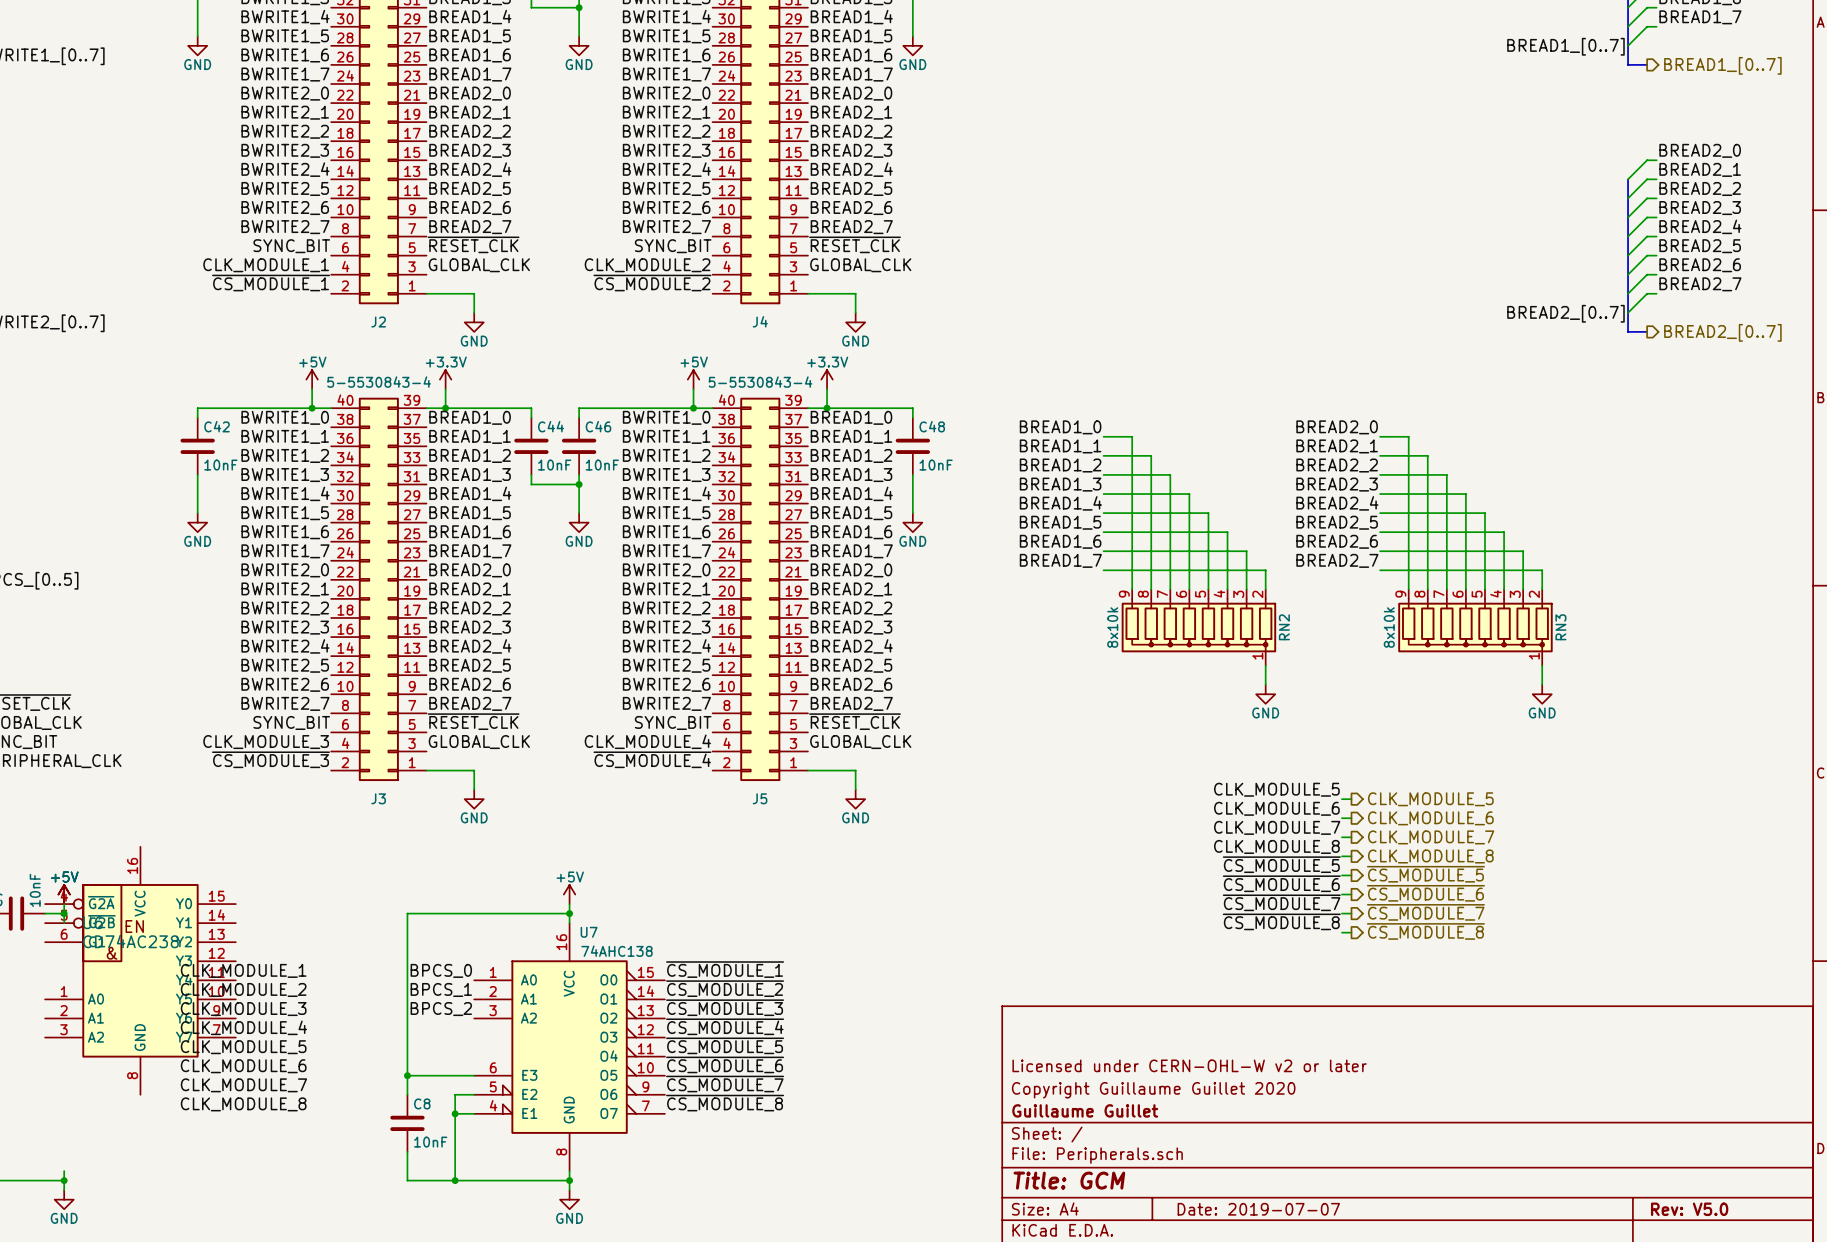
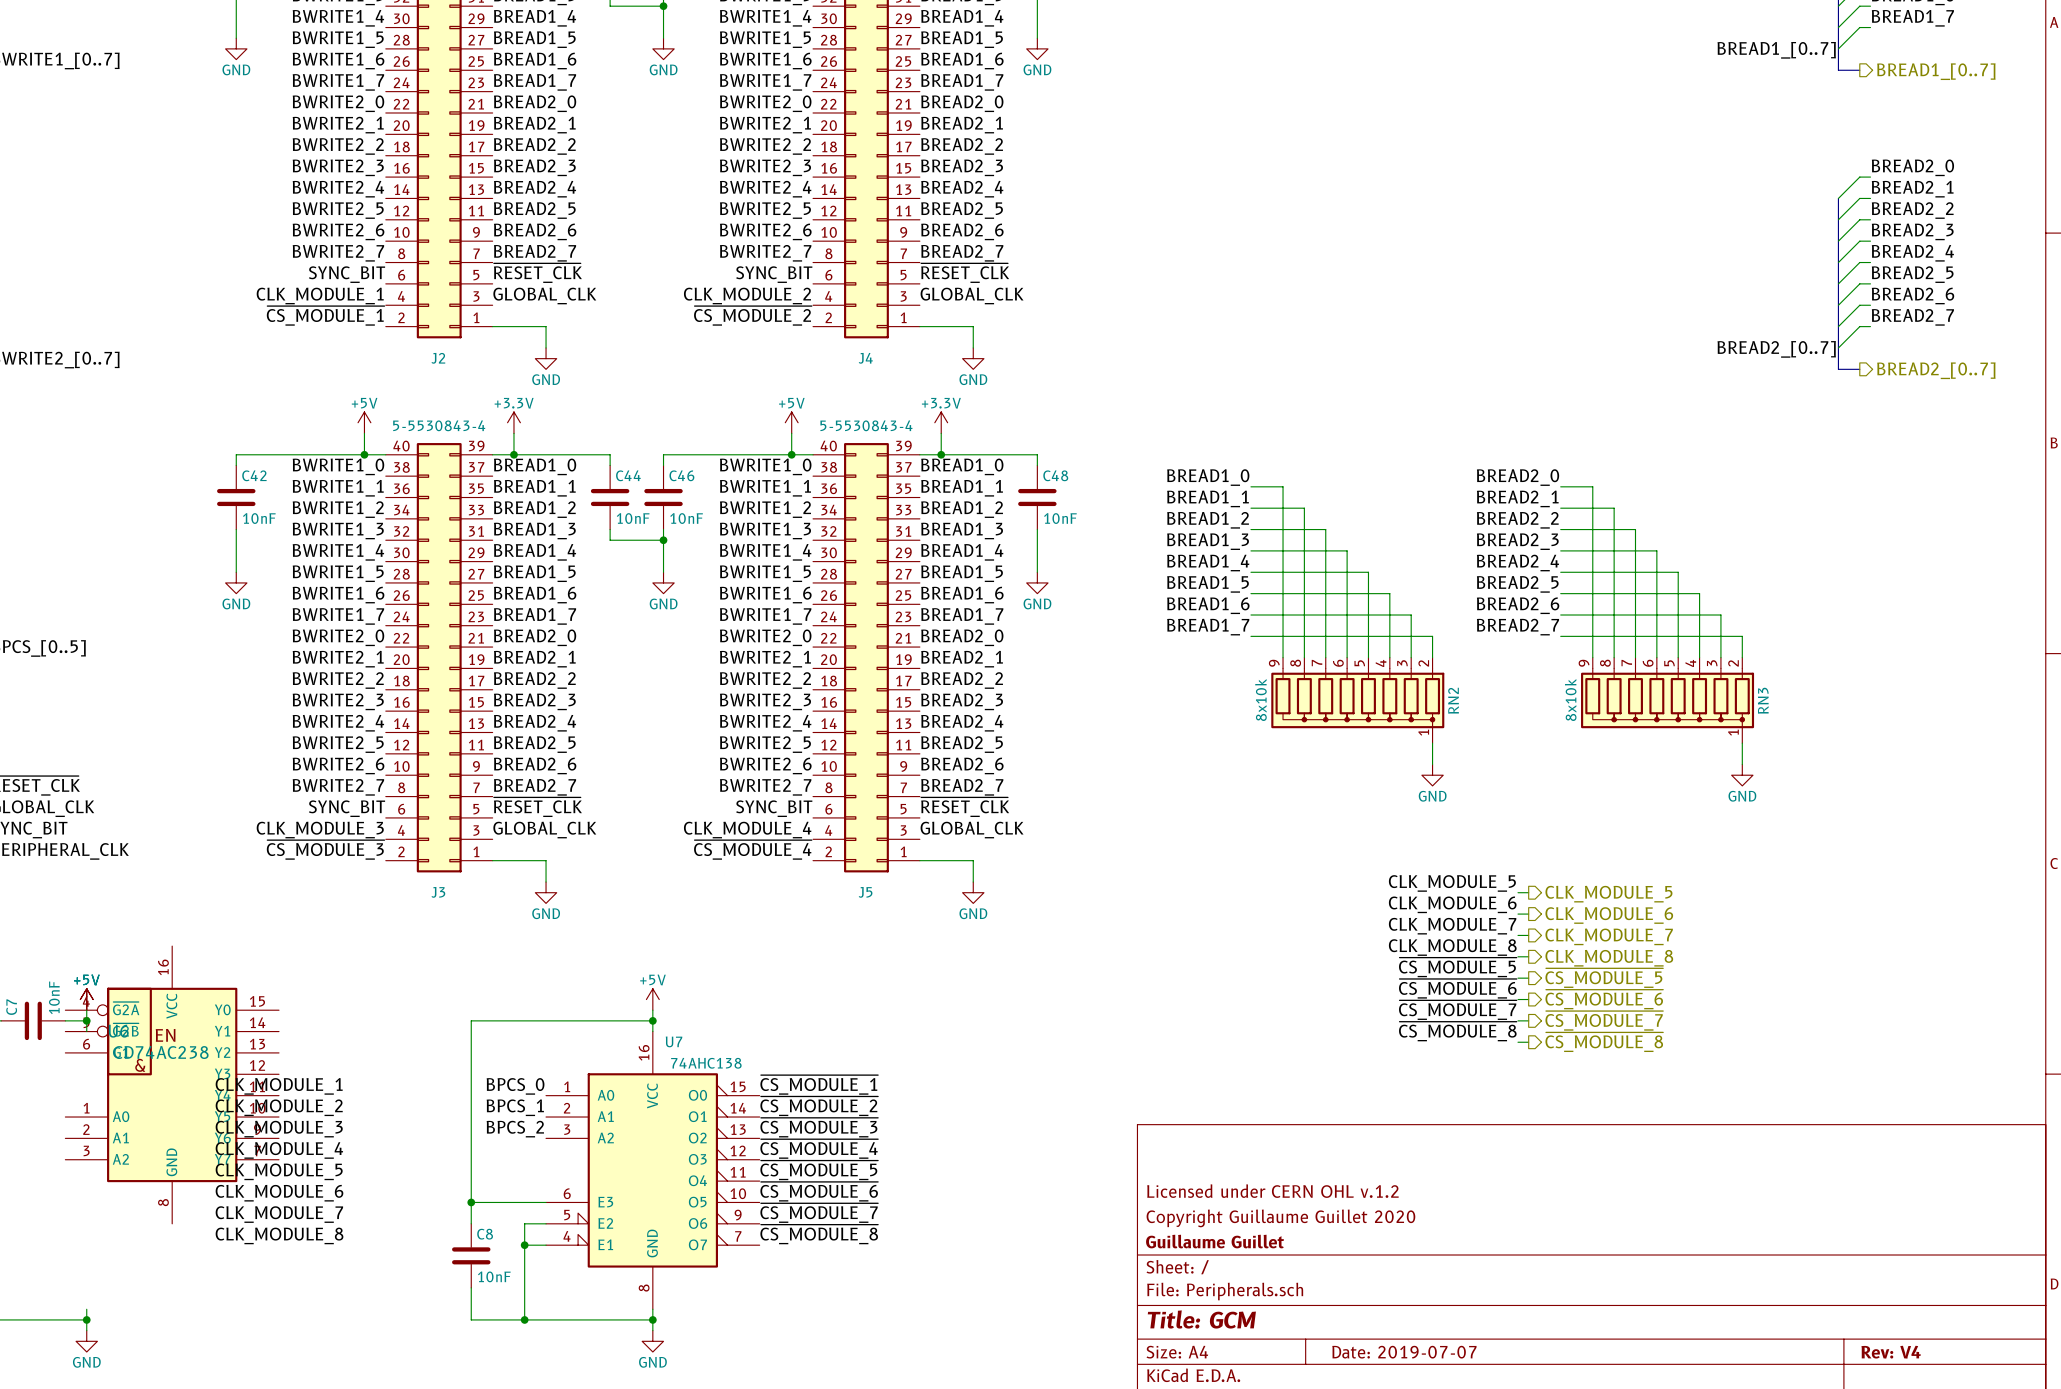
title block: Licensed under CERN-OHL-W v2 or later (1189, 1065) -> Licensed under CERN OHL v.1.2 (1272, 1191)
title block: Rev: V5.0 (1689, 1209) -> Rev: V4 (1891, 1352)

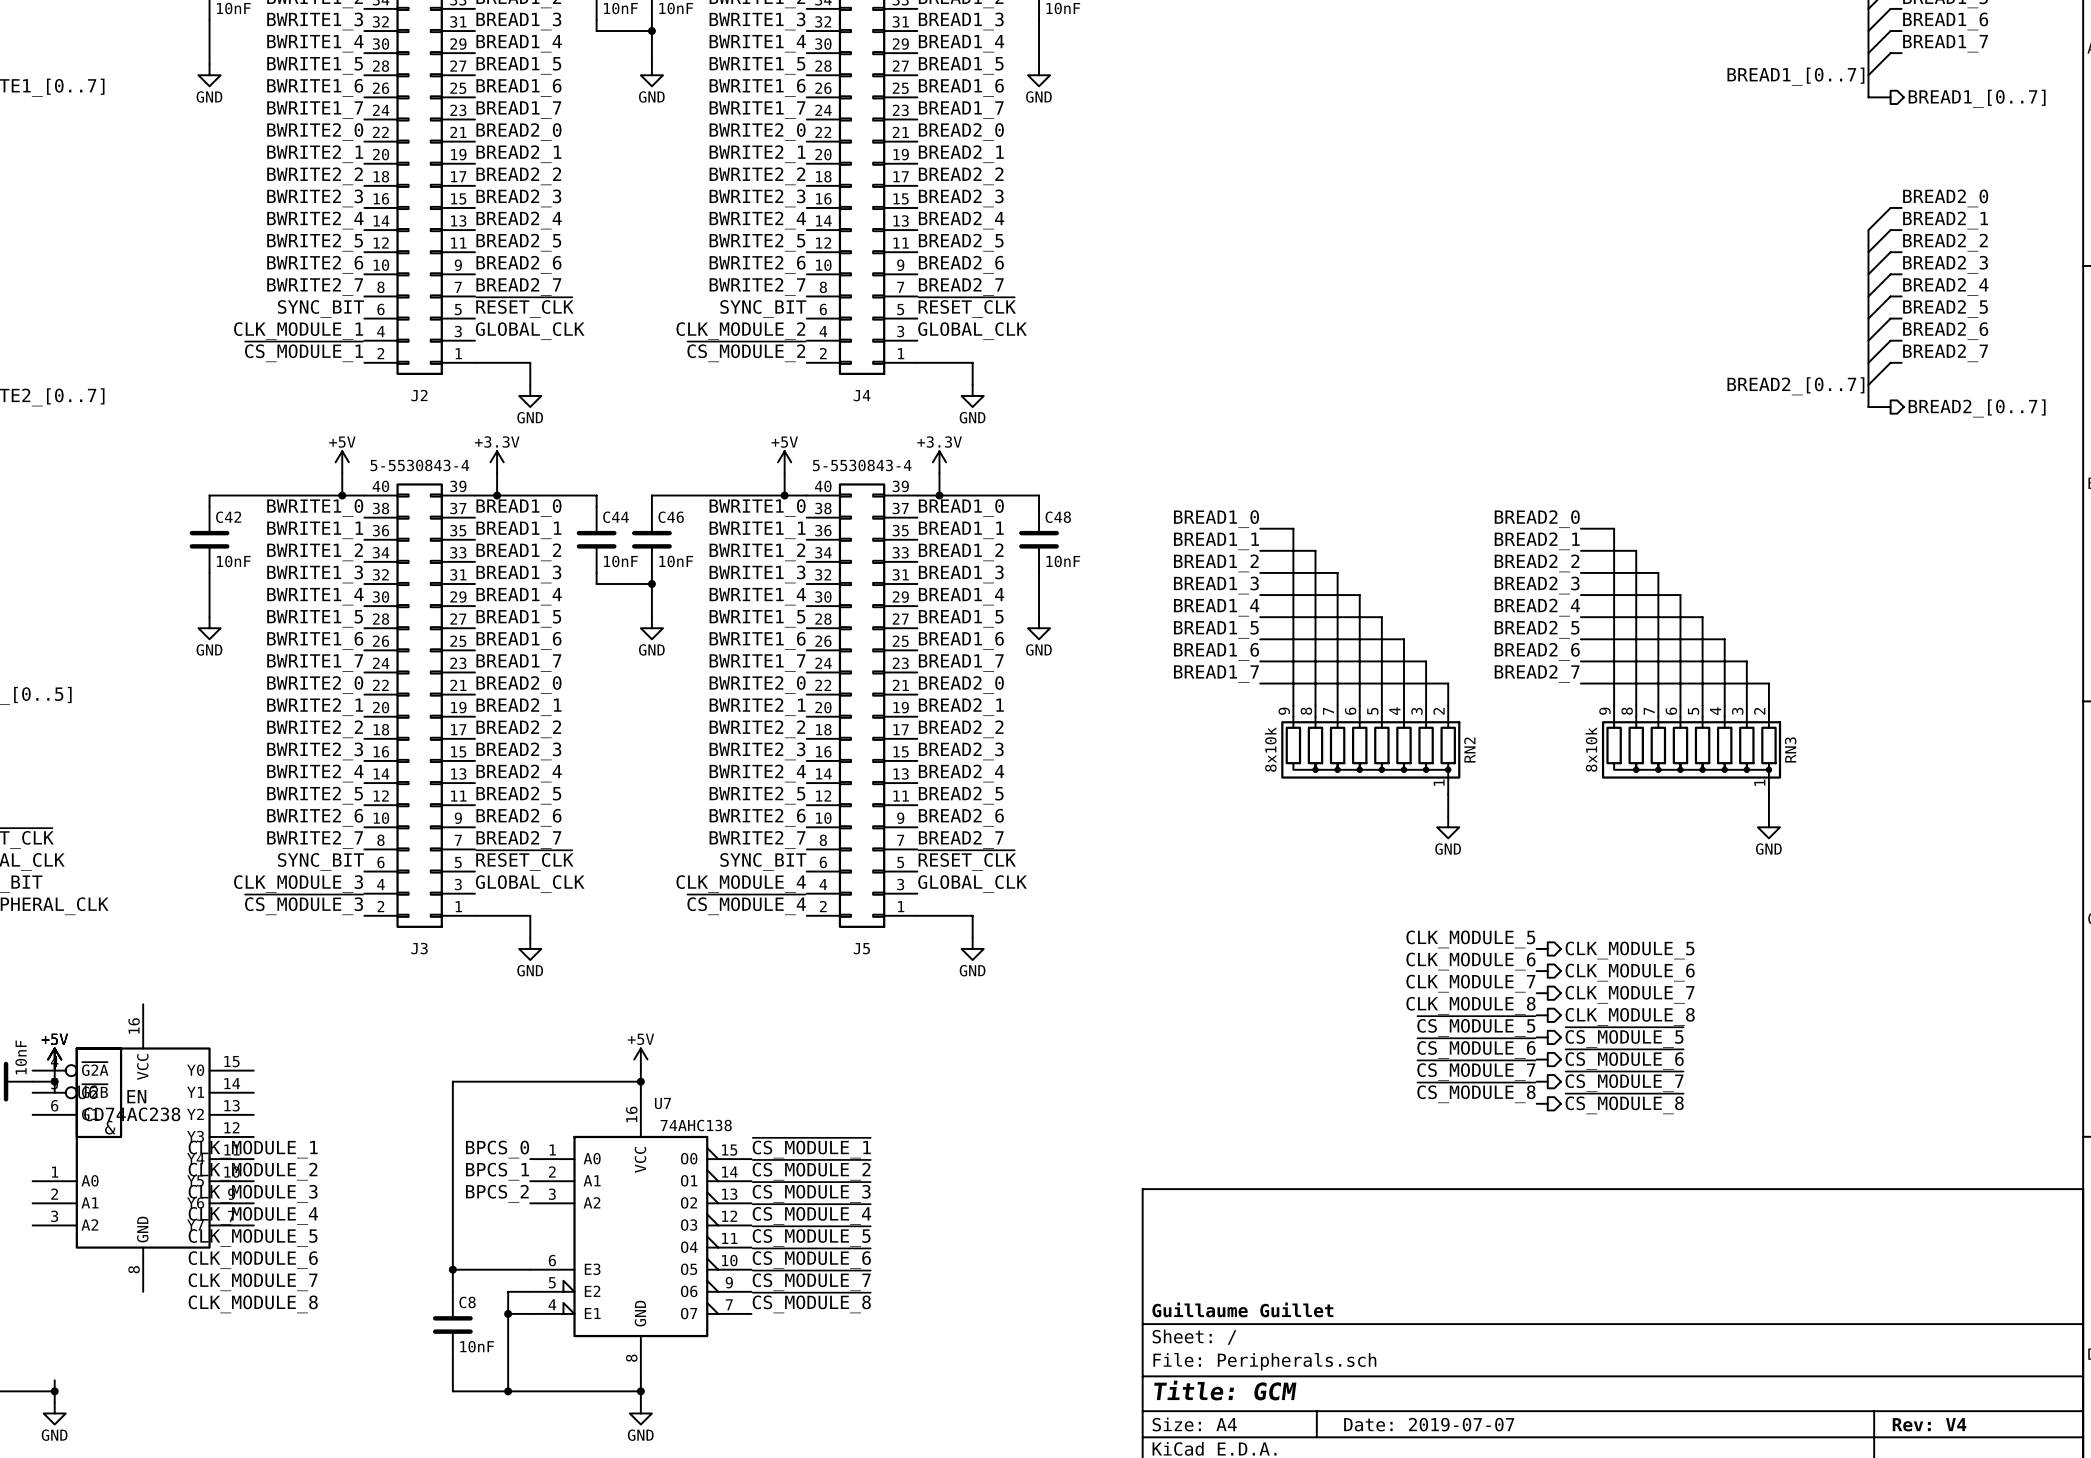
title block: Licensed under CERN OHL v.1.2 (1272, 1191) -> none
title block: Copyright Guillaume Guillet 2020 (1280, 1218) -> none

